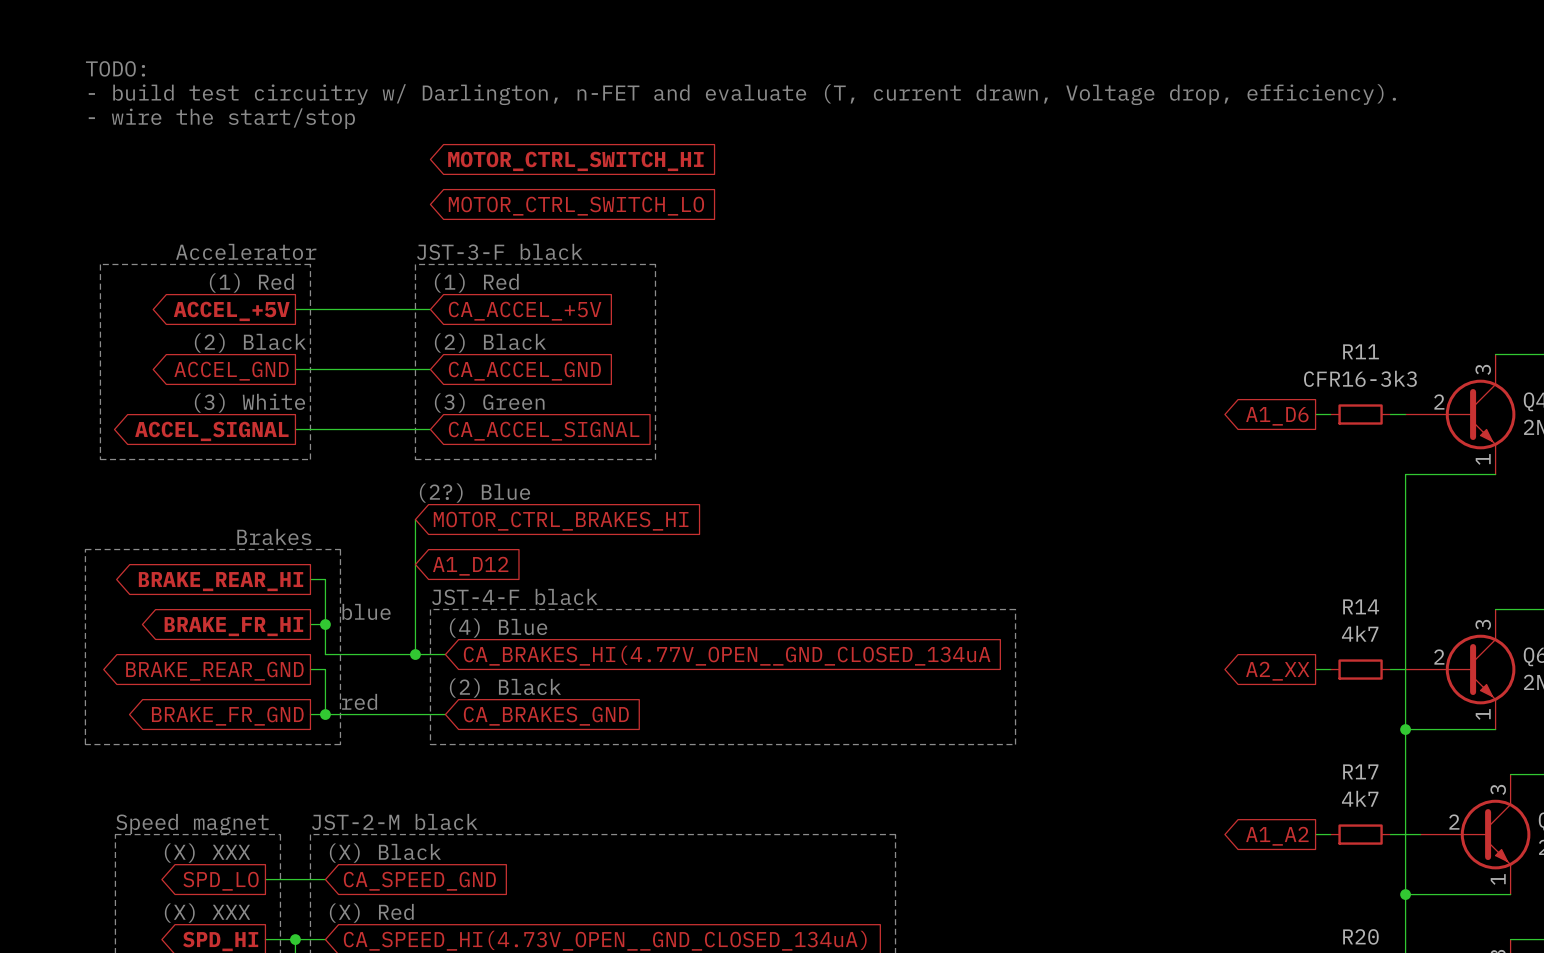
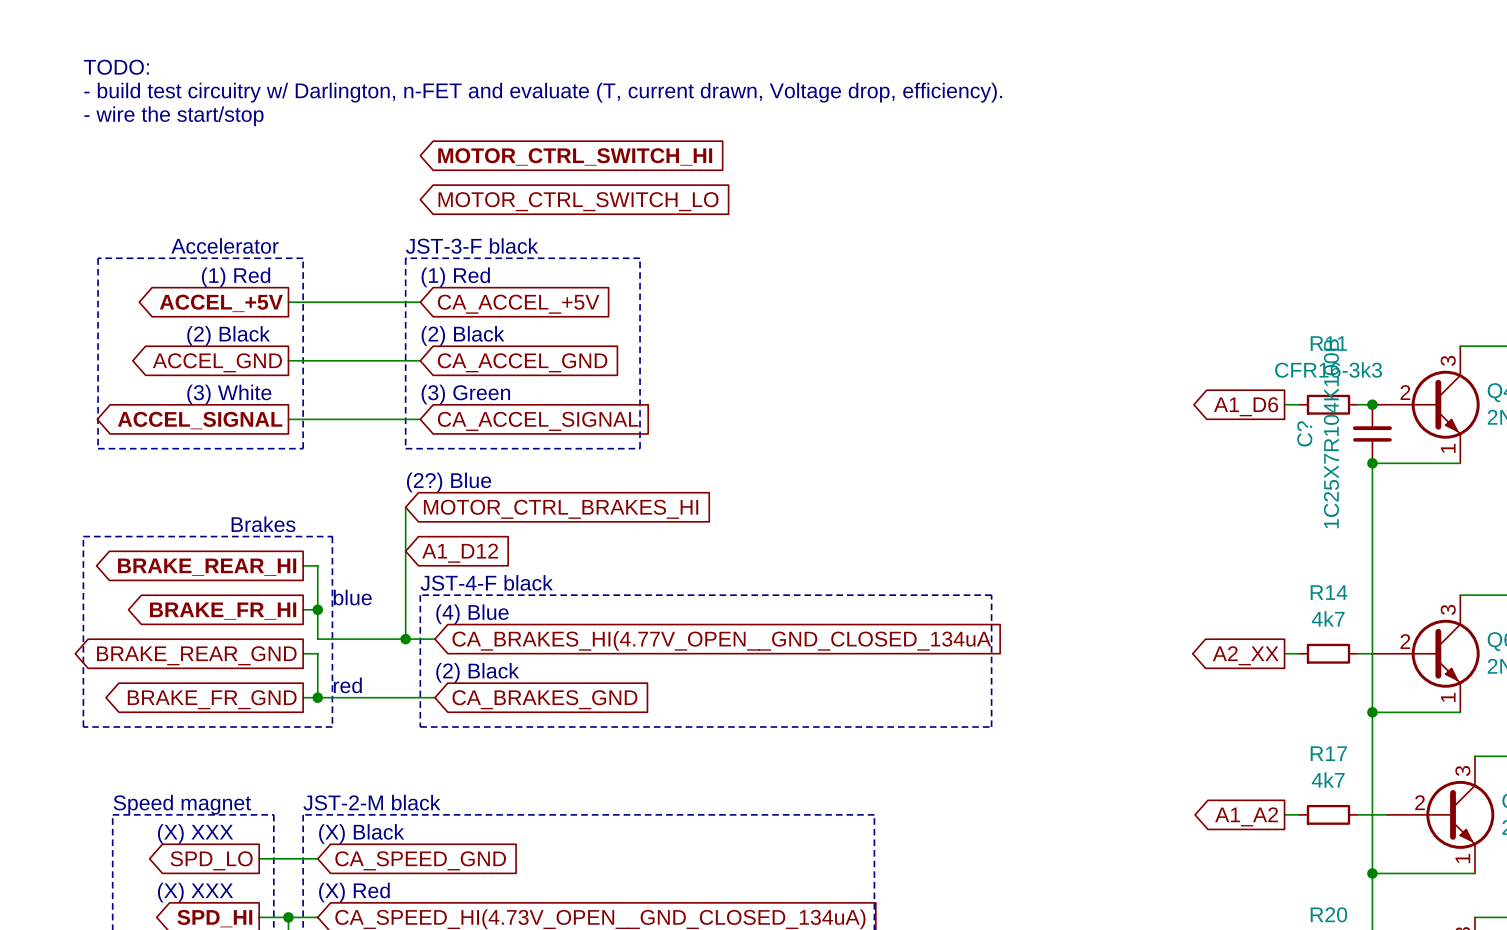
junction: none -> (1372, 404)
C?: none -> 1C25X7R104K100B (1372, 434)
junction: none -> (1372, 463)

